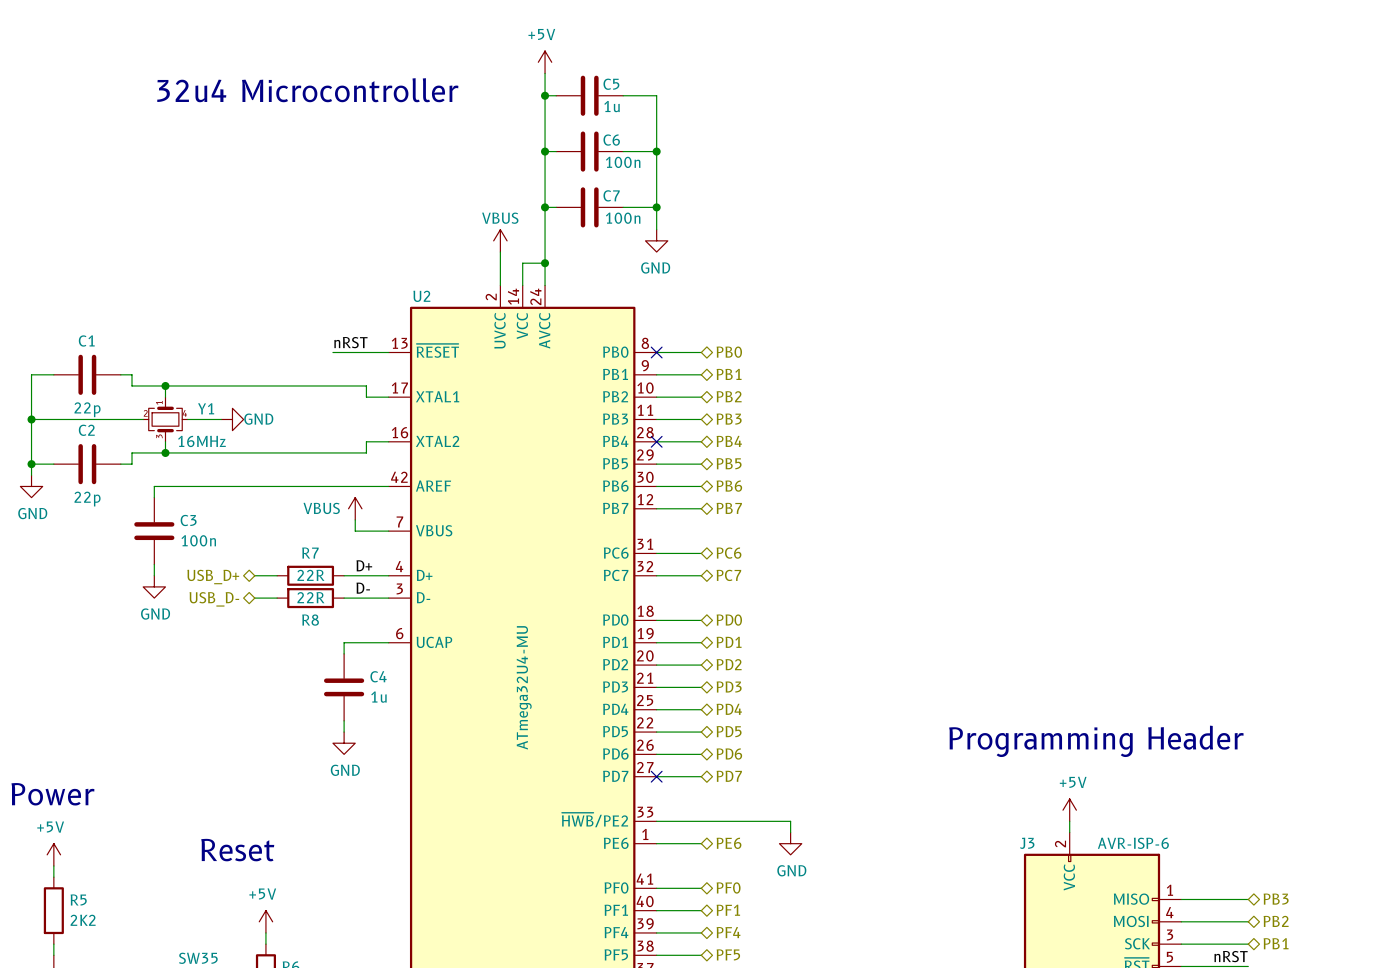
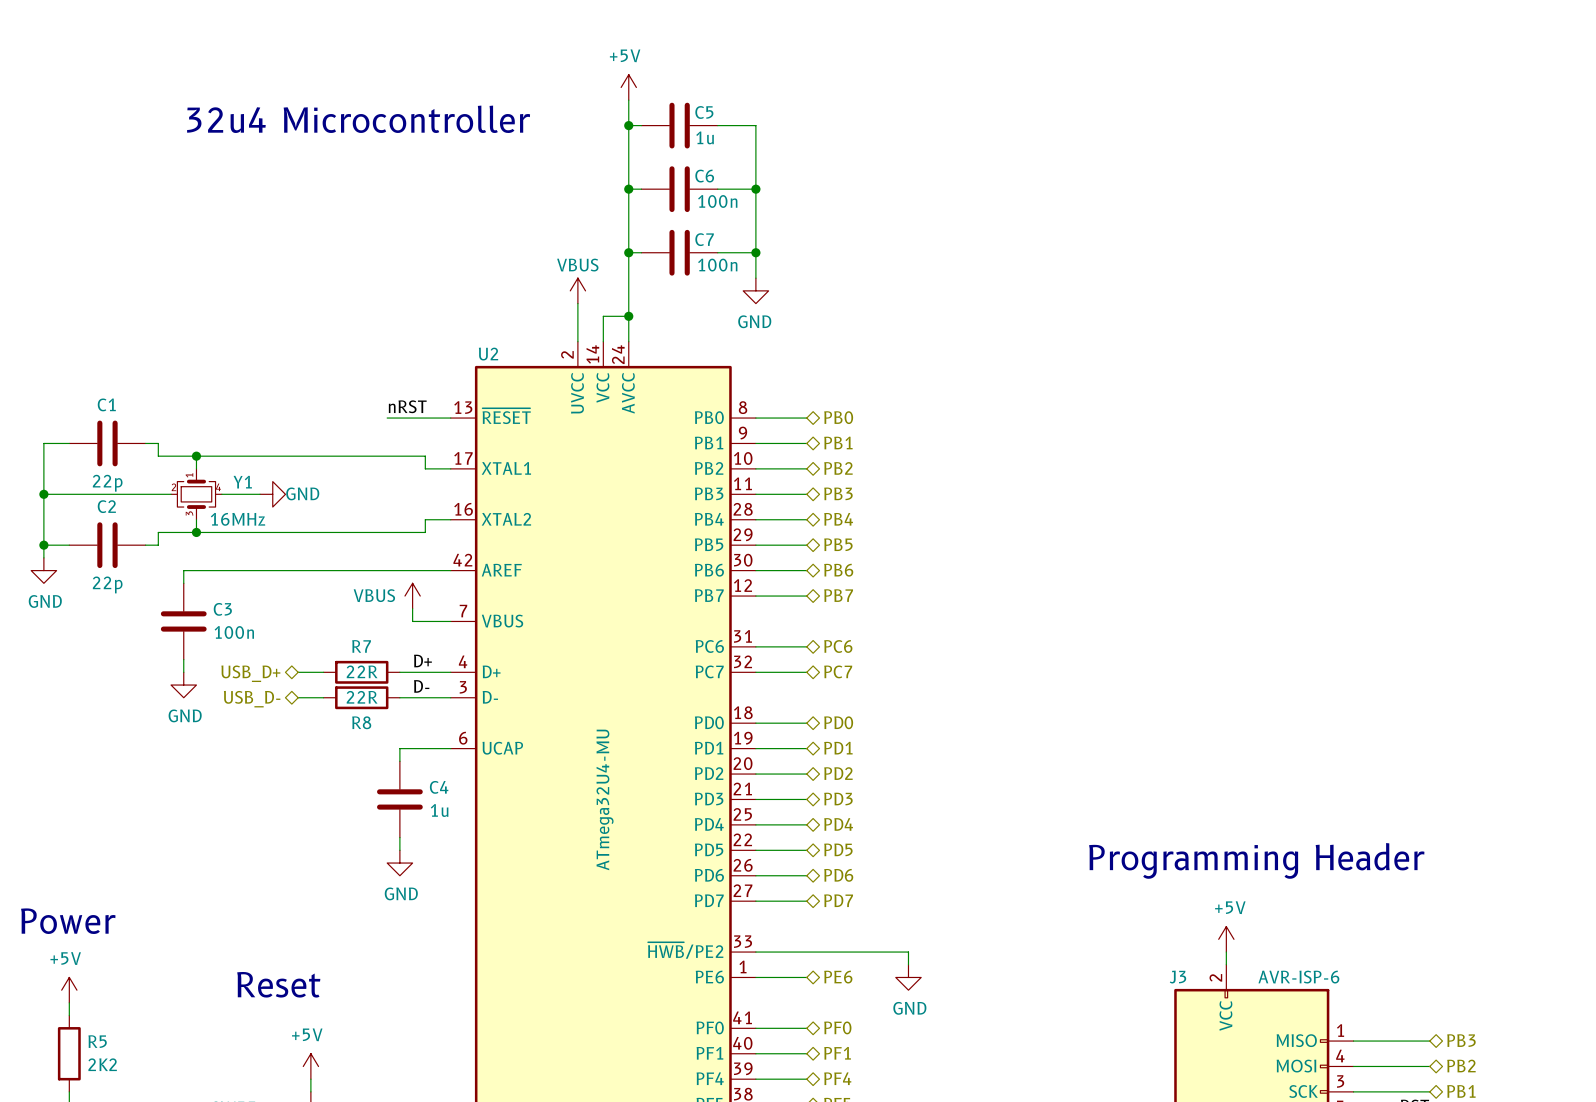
no-connect mark: (656, 352) -> none
no-connect mark: (656, 441) -> none
no-connect mark: (656, 776) -> none

